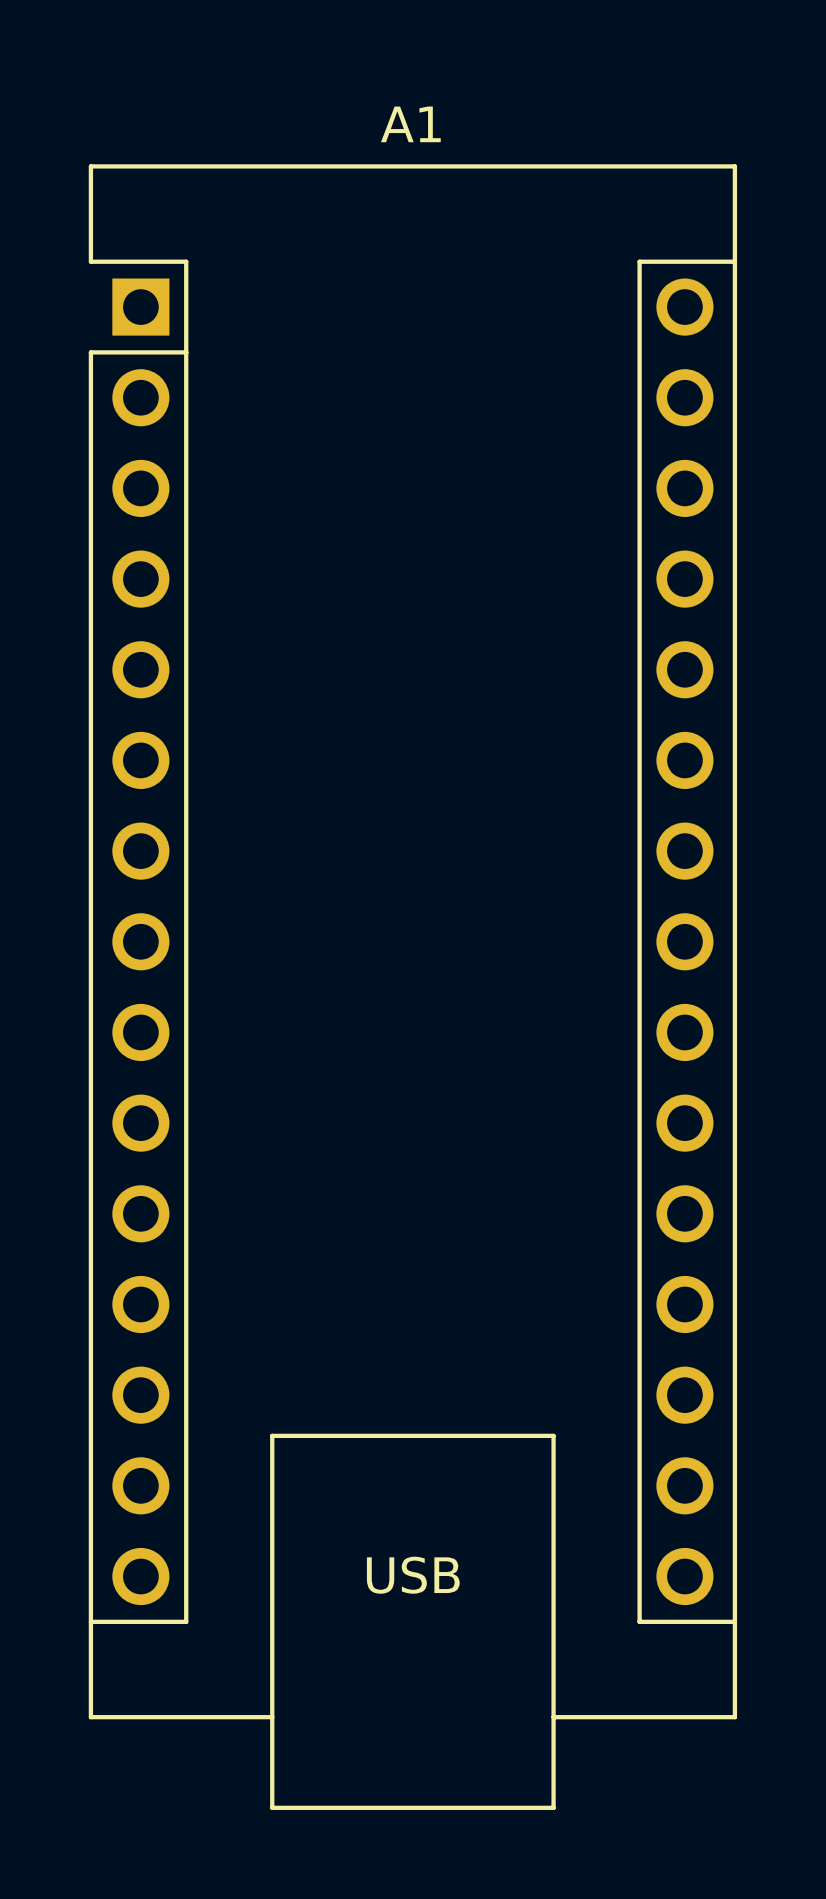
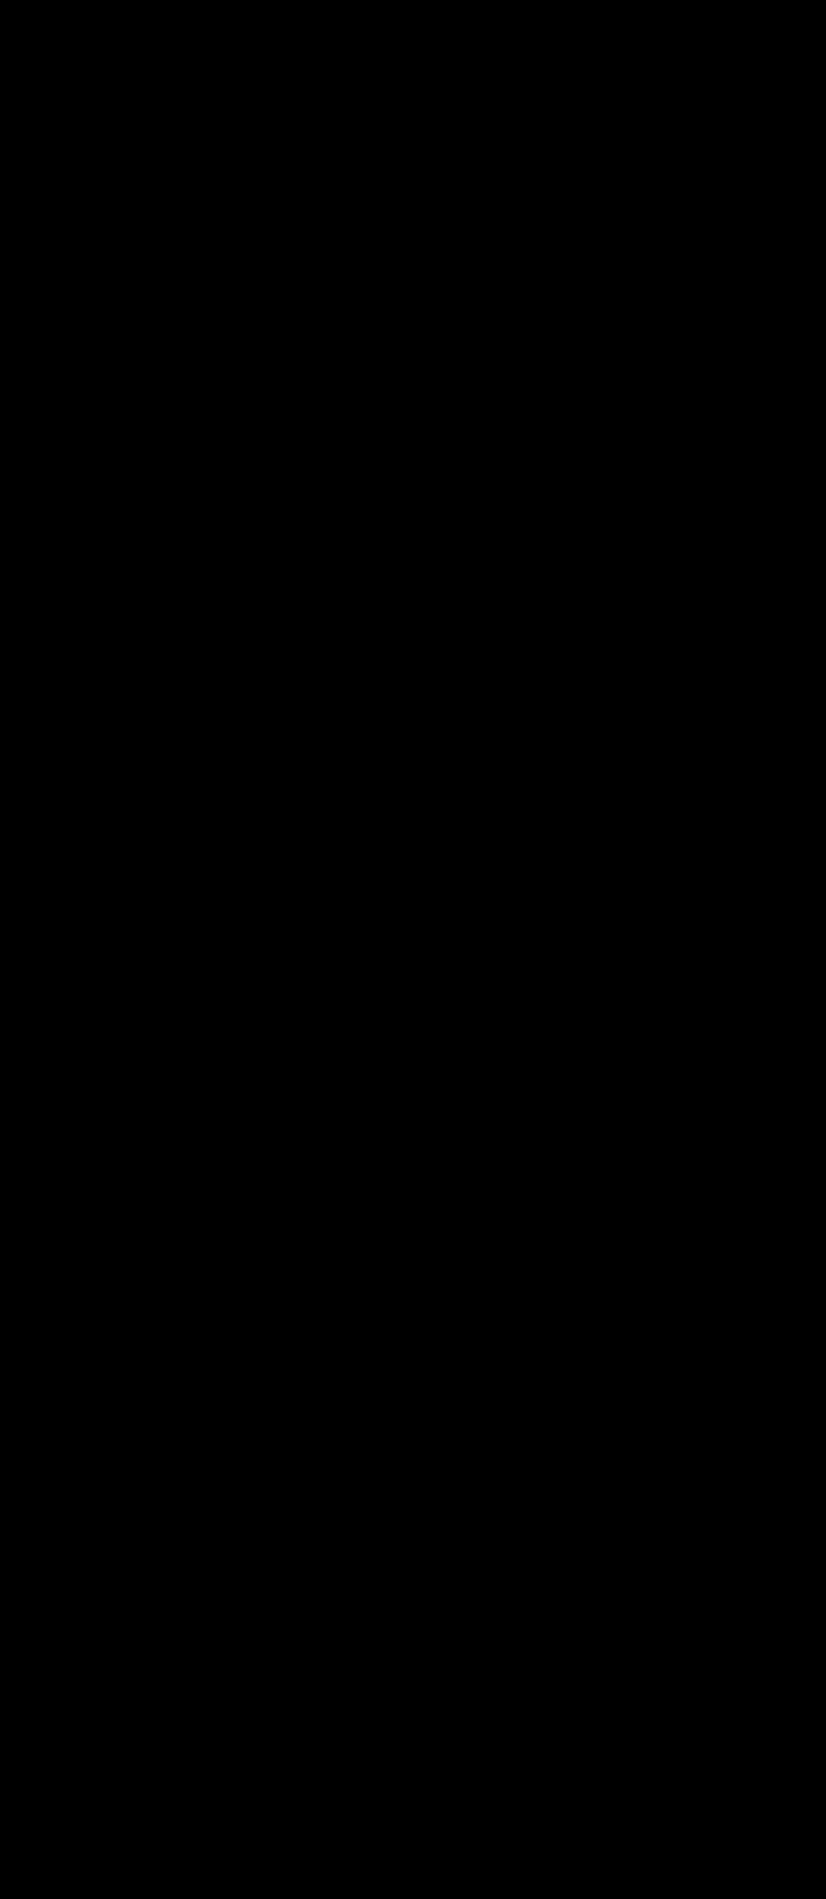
A1: (412, 987) -> none

